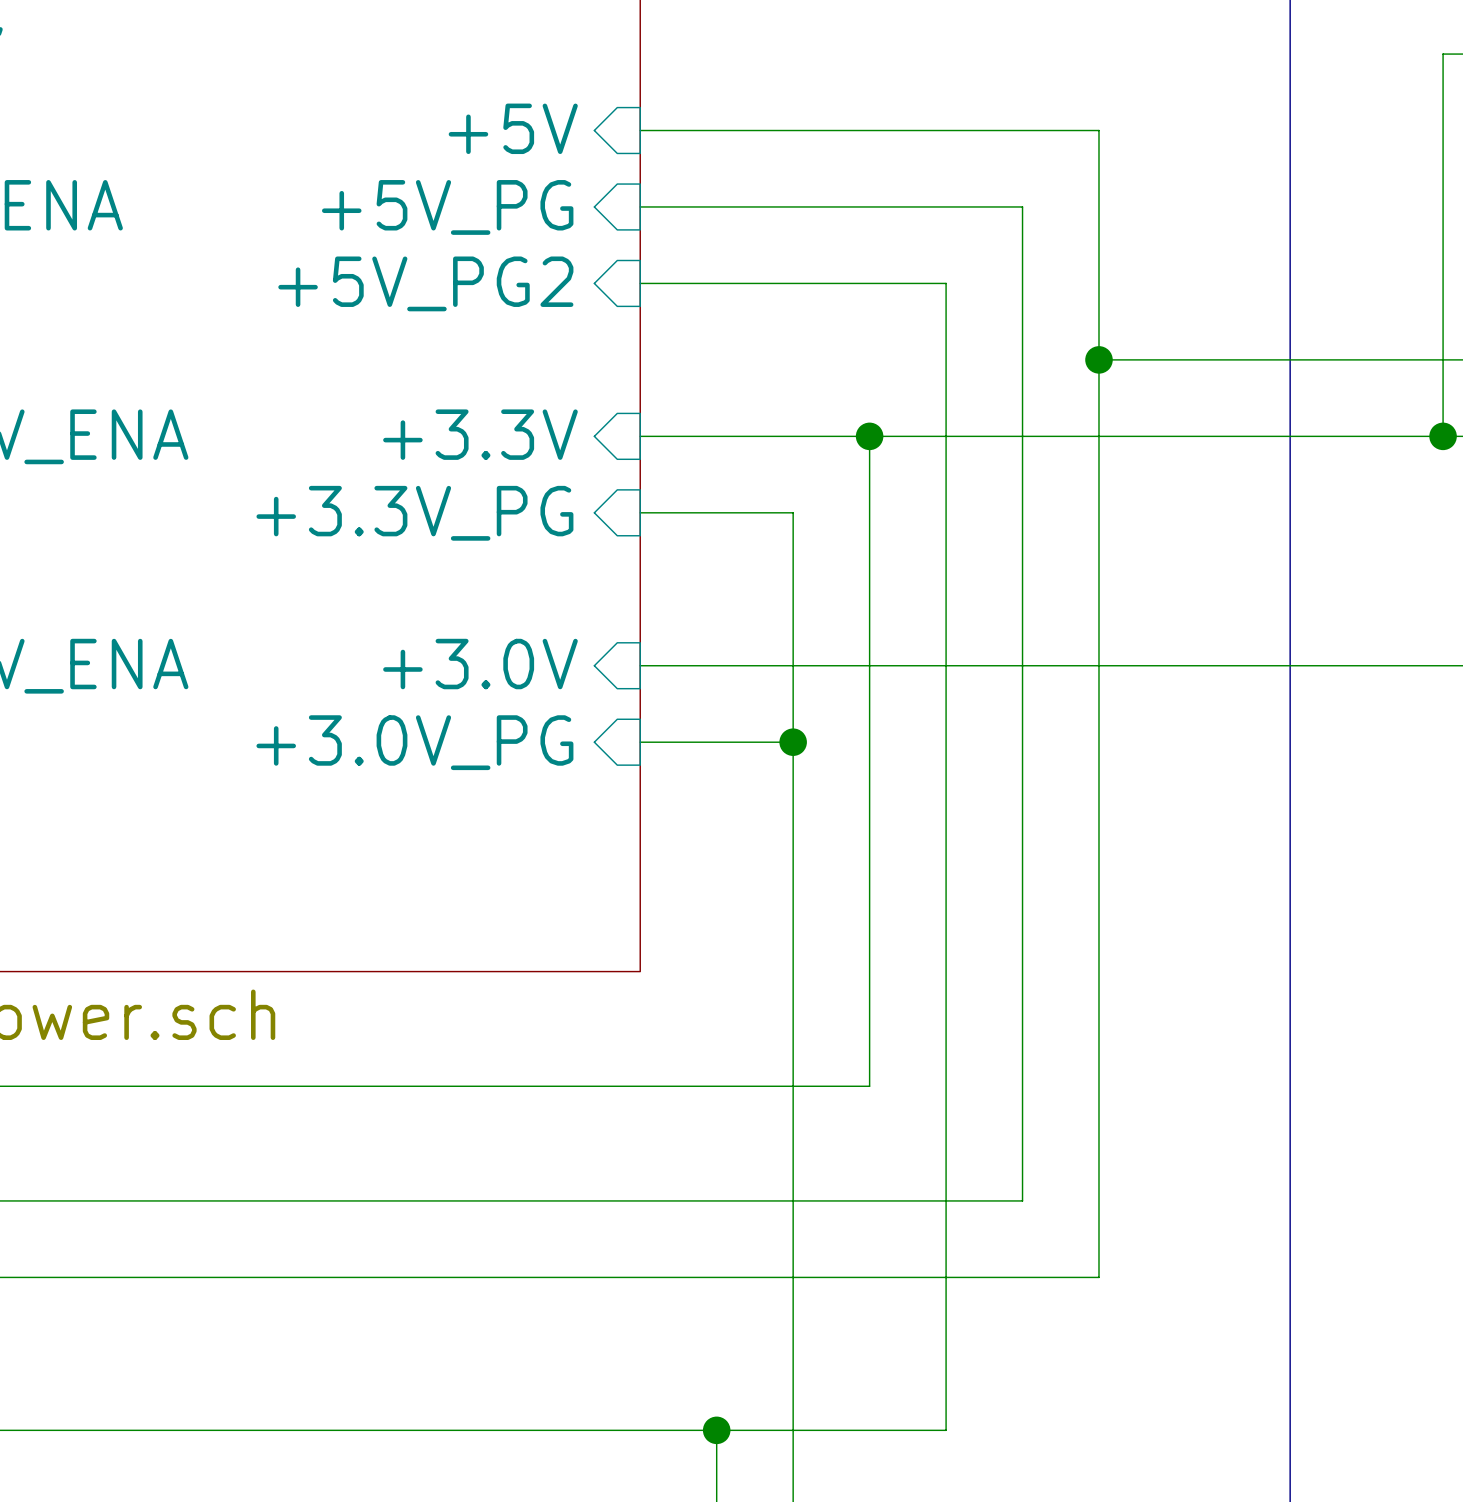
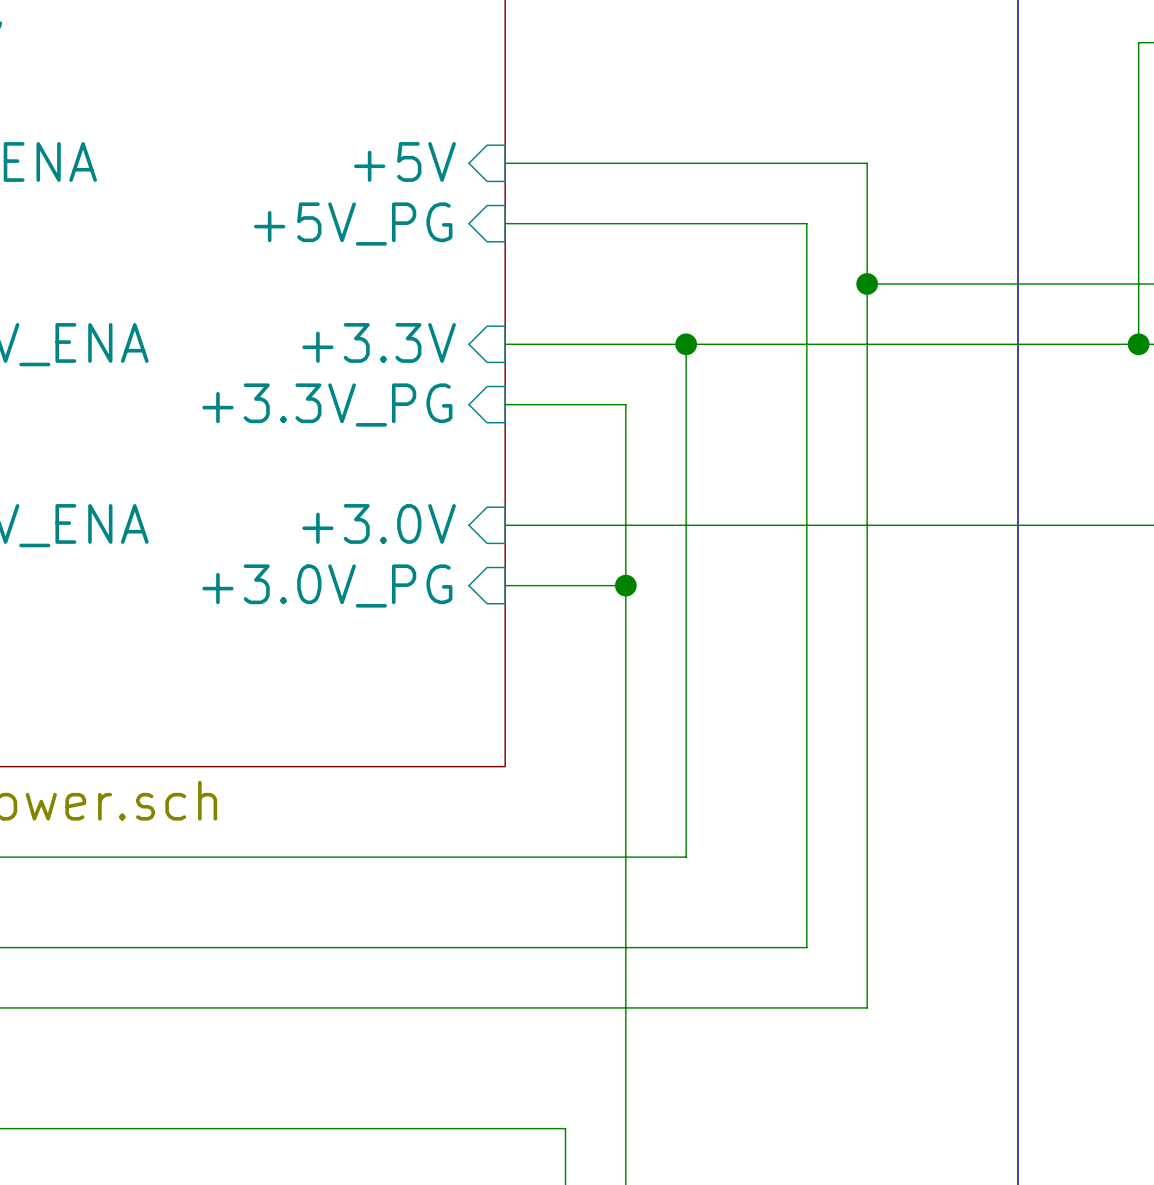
sheet pin: +5V (513, 128) -> none
wire: (640, 130) (1098, 130) (1098, 206) -> none
wire: (1022, 206) (1022, 283) -> (806, 163) (867, 163)
sheet pin: +5V_PG (447, 207) -> +5V (404, 161)
sheet pin: +5V_PG2 (425, 283) -> +5V_PG (353, 224)
wire: (946, 283) (946, 1430) (716, 1430) -> (746, 223) (806, 223)
junction: (716, 1430) -> none

